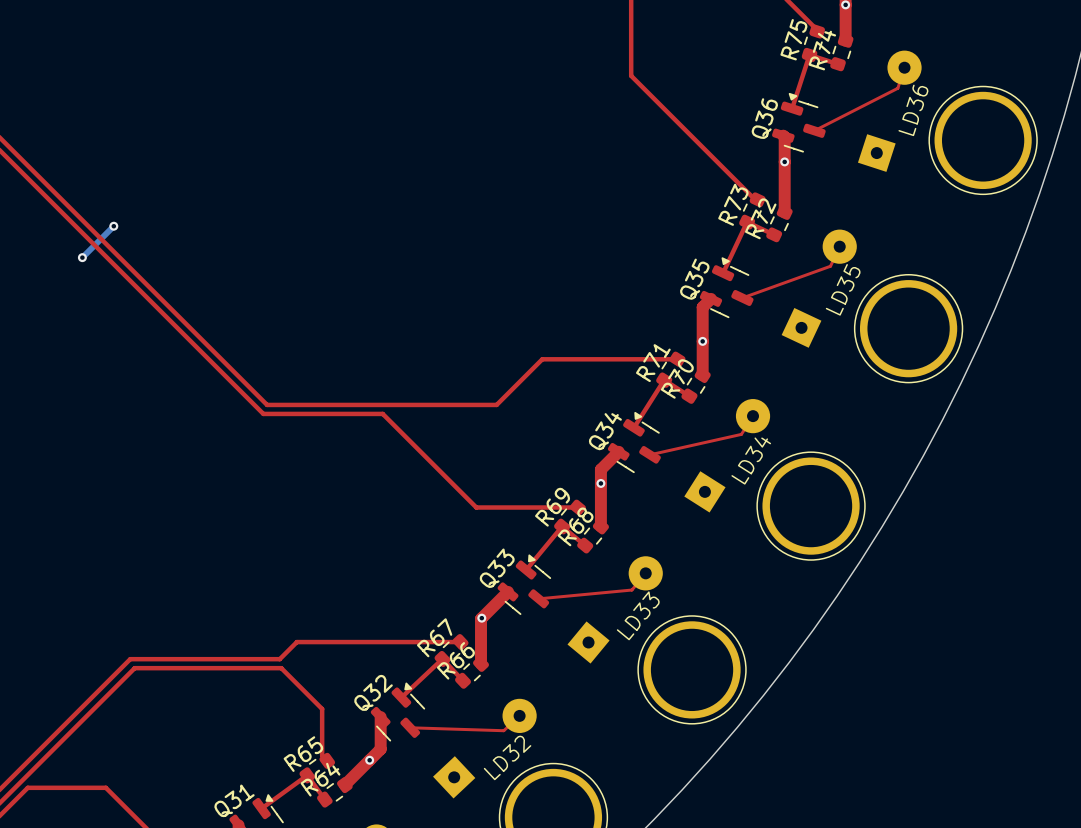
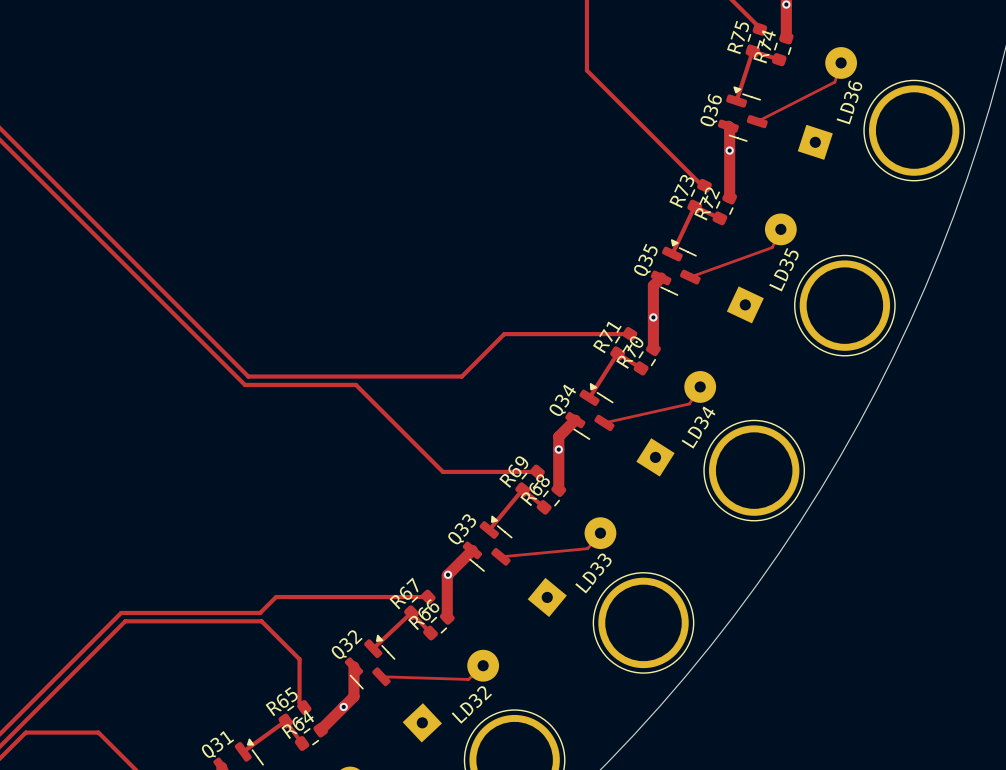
bottom track: (113, 226) (82, 257) -> none
via: (113, 226) -> none
via: (82, 257) -> none

